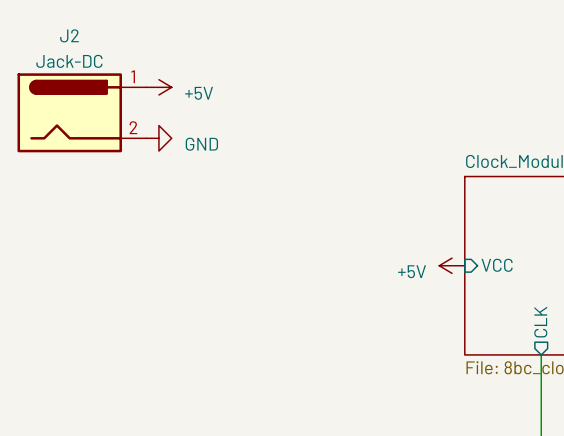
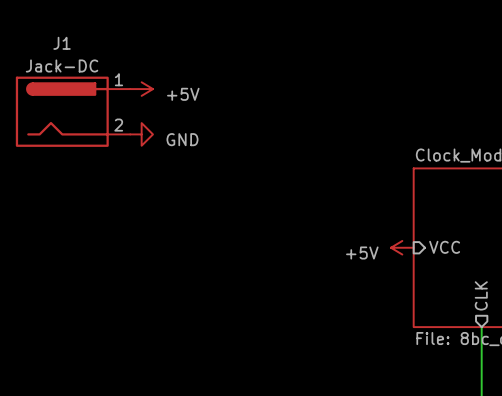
J2 name: J2 (69, 35) -> J1 (62, 43)

